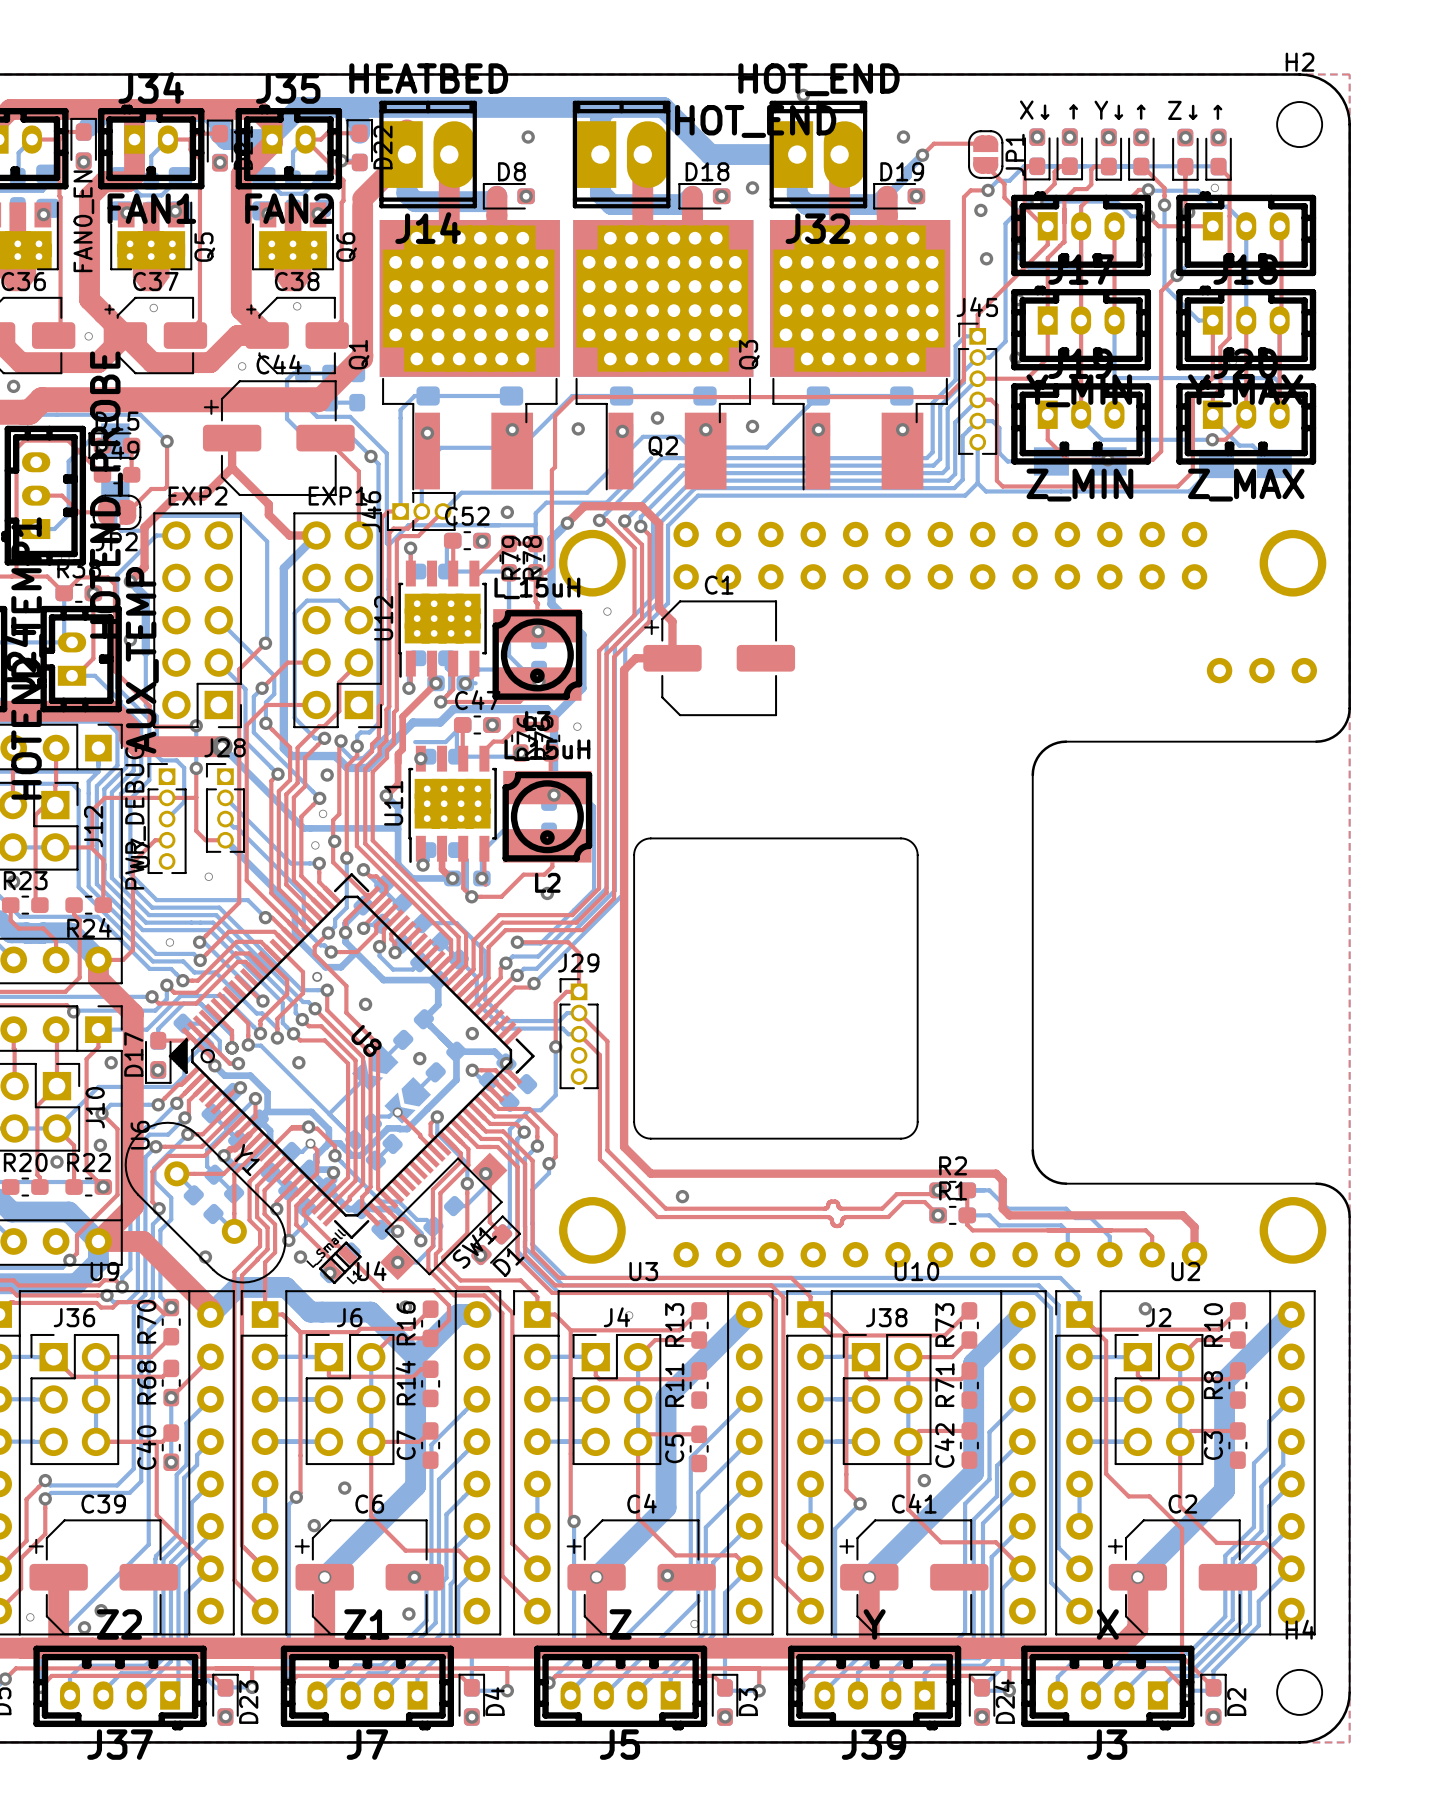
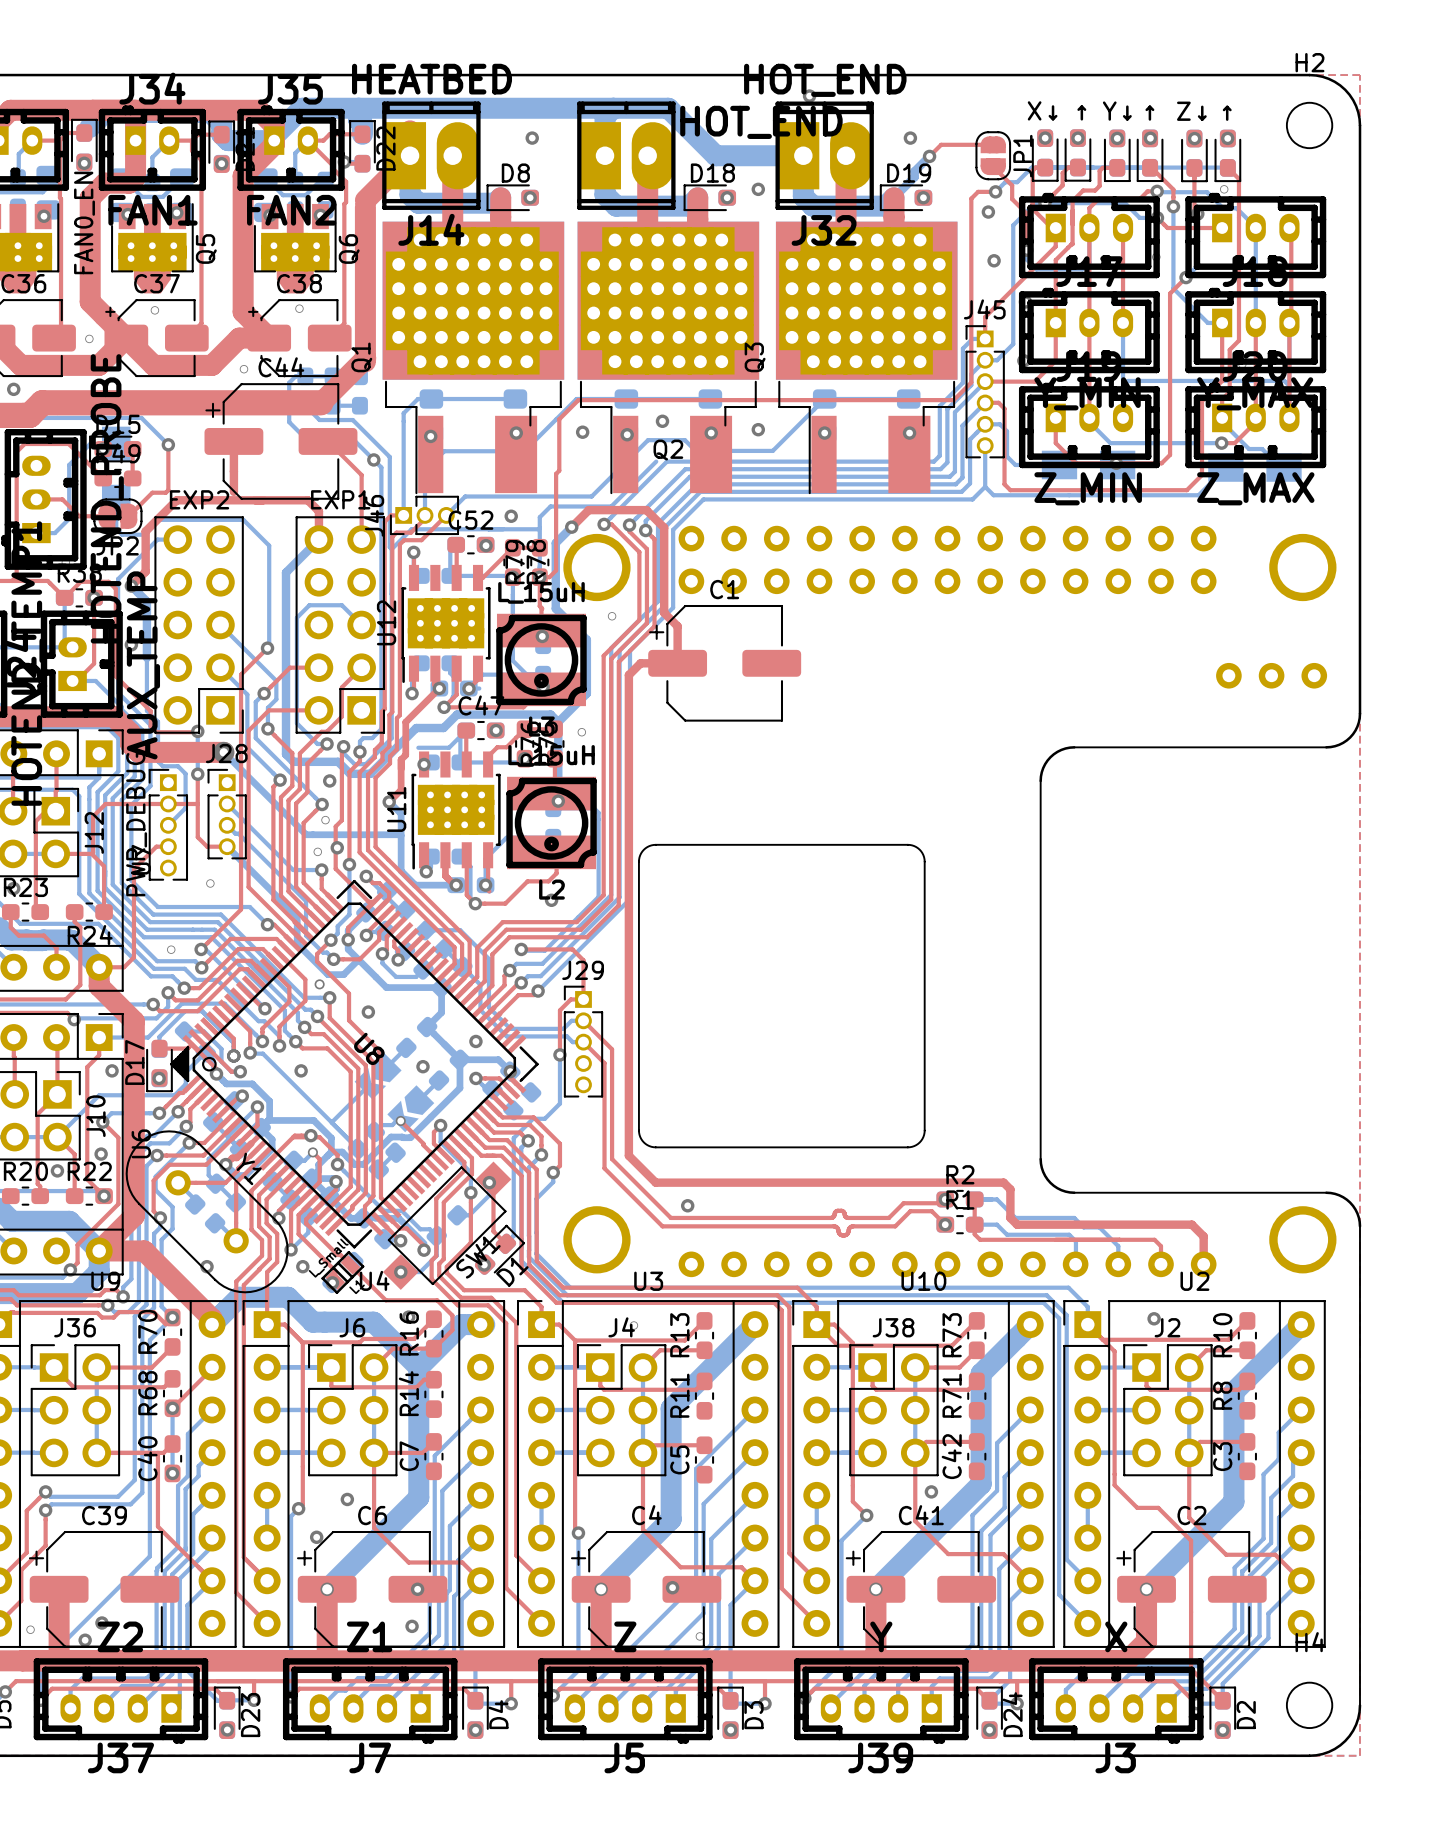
top track: none -> (233, 471) (233, 491)
top track: (203, 496) (232, 467) (268, 504) (268, 514) (289, 535) (316, 535) -> (205, 500) (307, 500) (318, 511) (318, 539)

